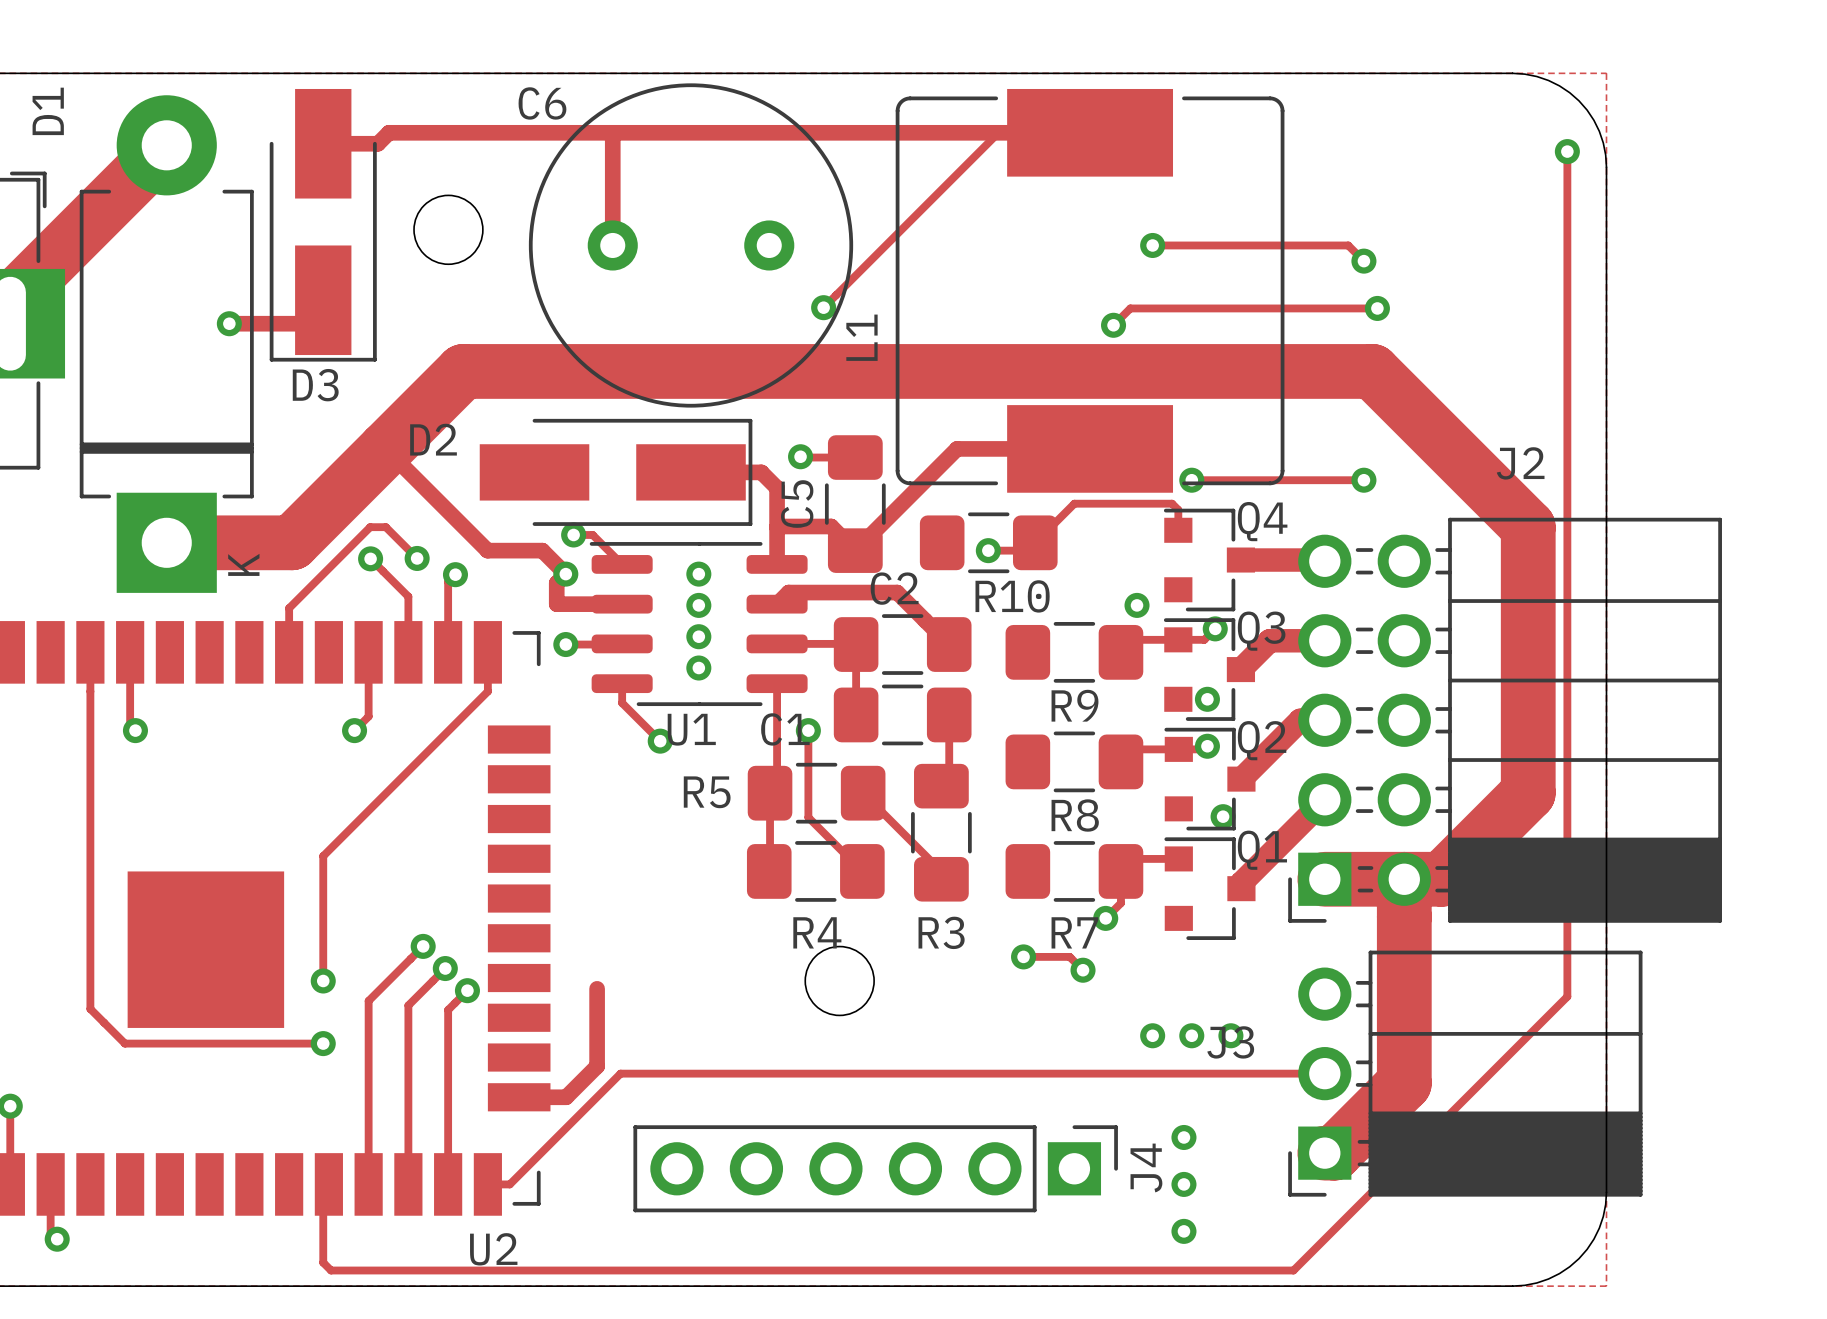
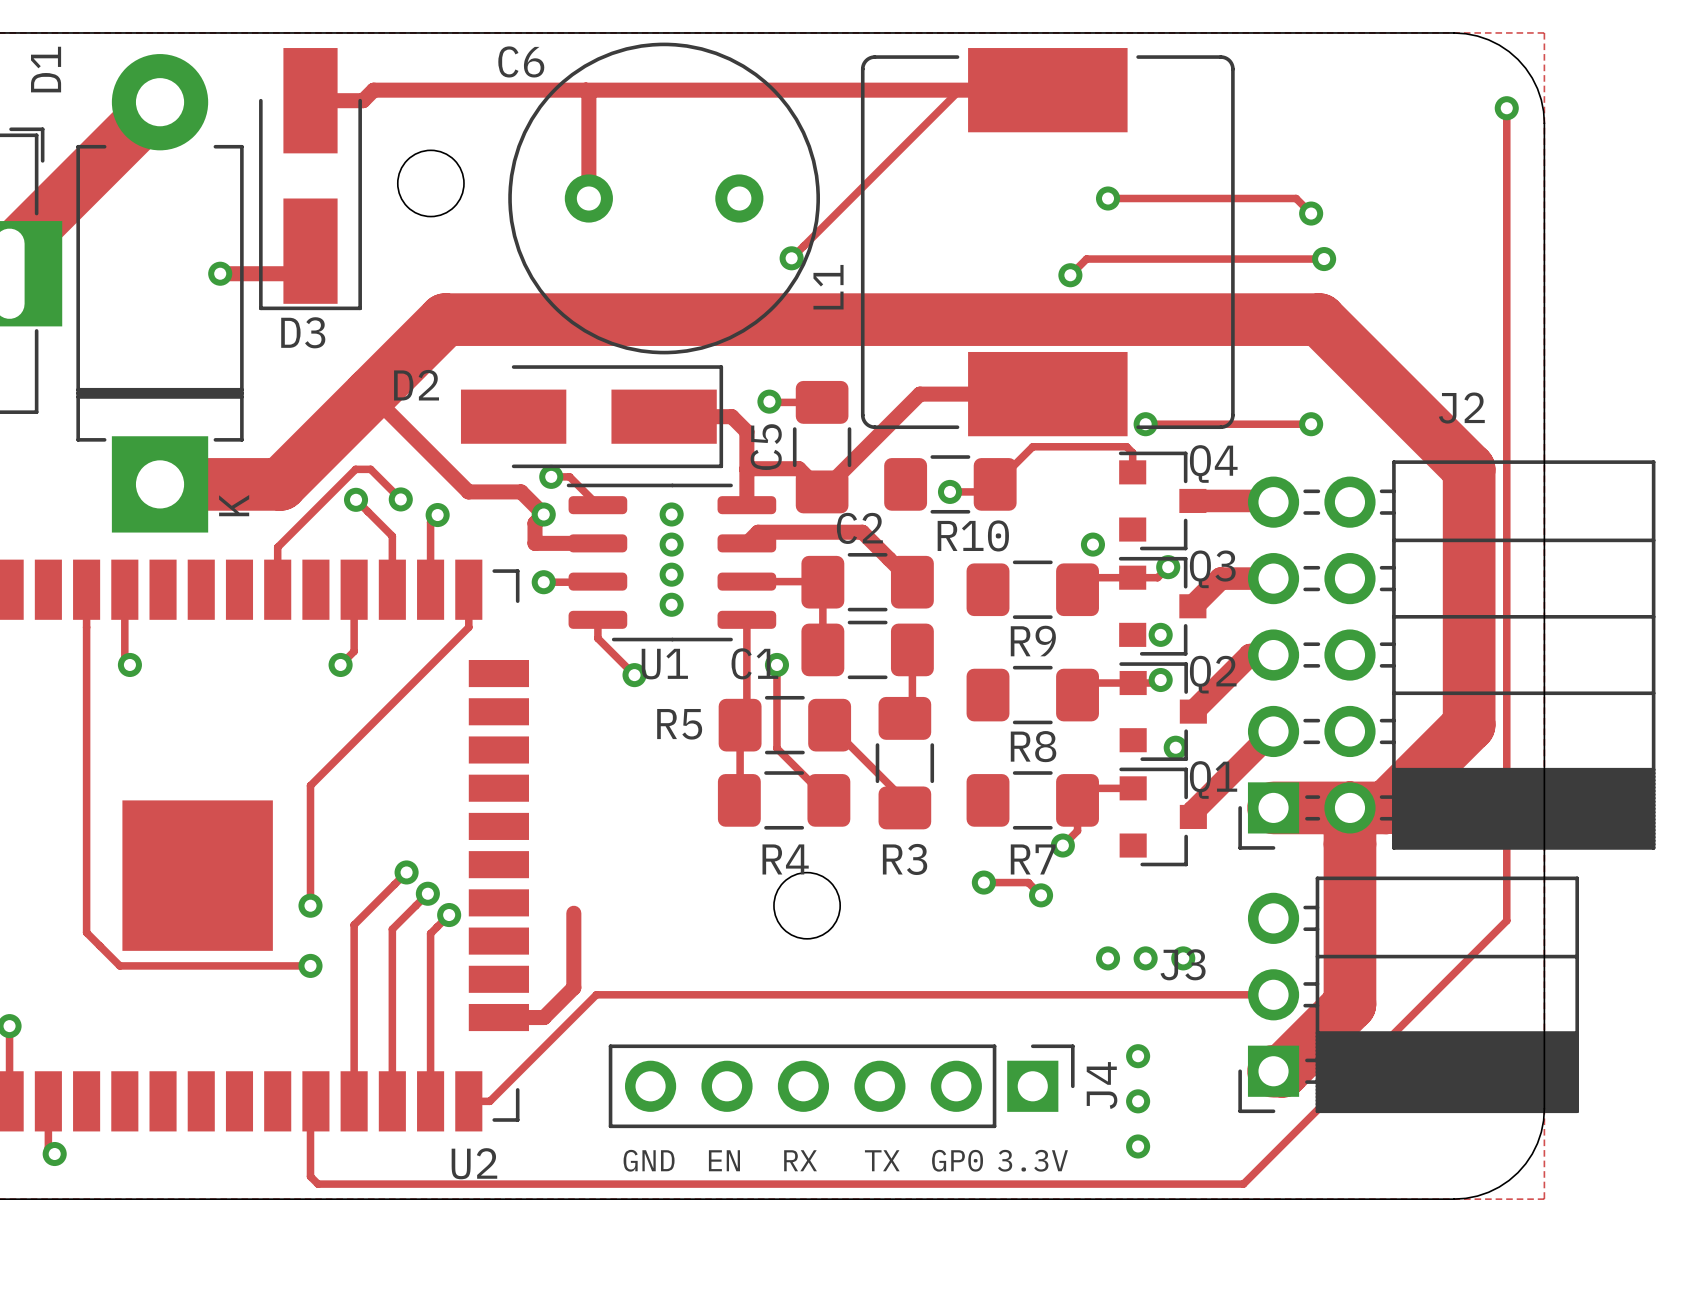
text: none -> GND (649, 1160)
text: none -> EN (724, 1160)
text: none -> RX (800, 1160)
text: none -> TX (882, 1160)
text: none -> GP0 (957, 1160)
text: none -> 3.3V (1032, 1160)

